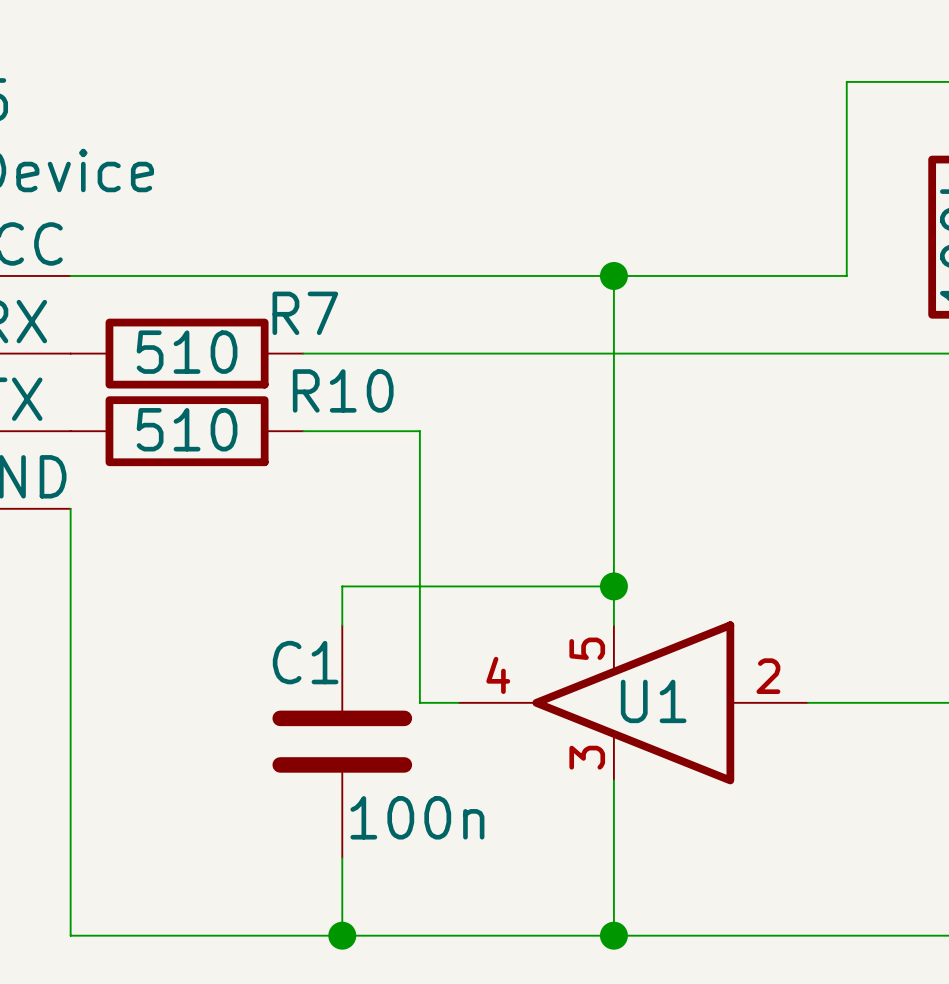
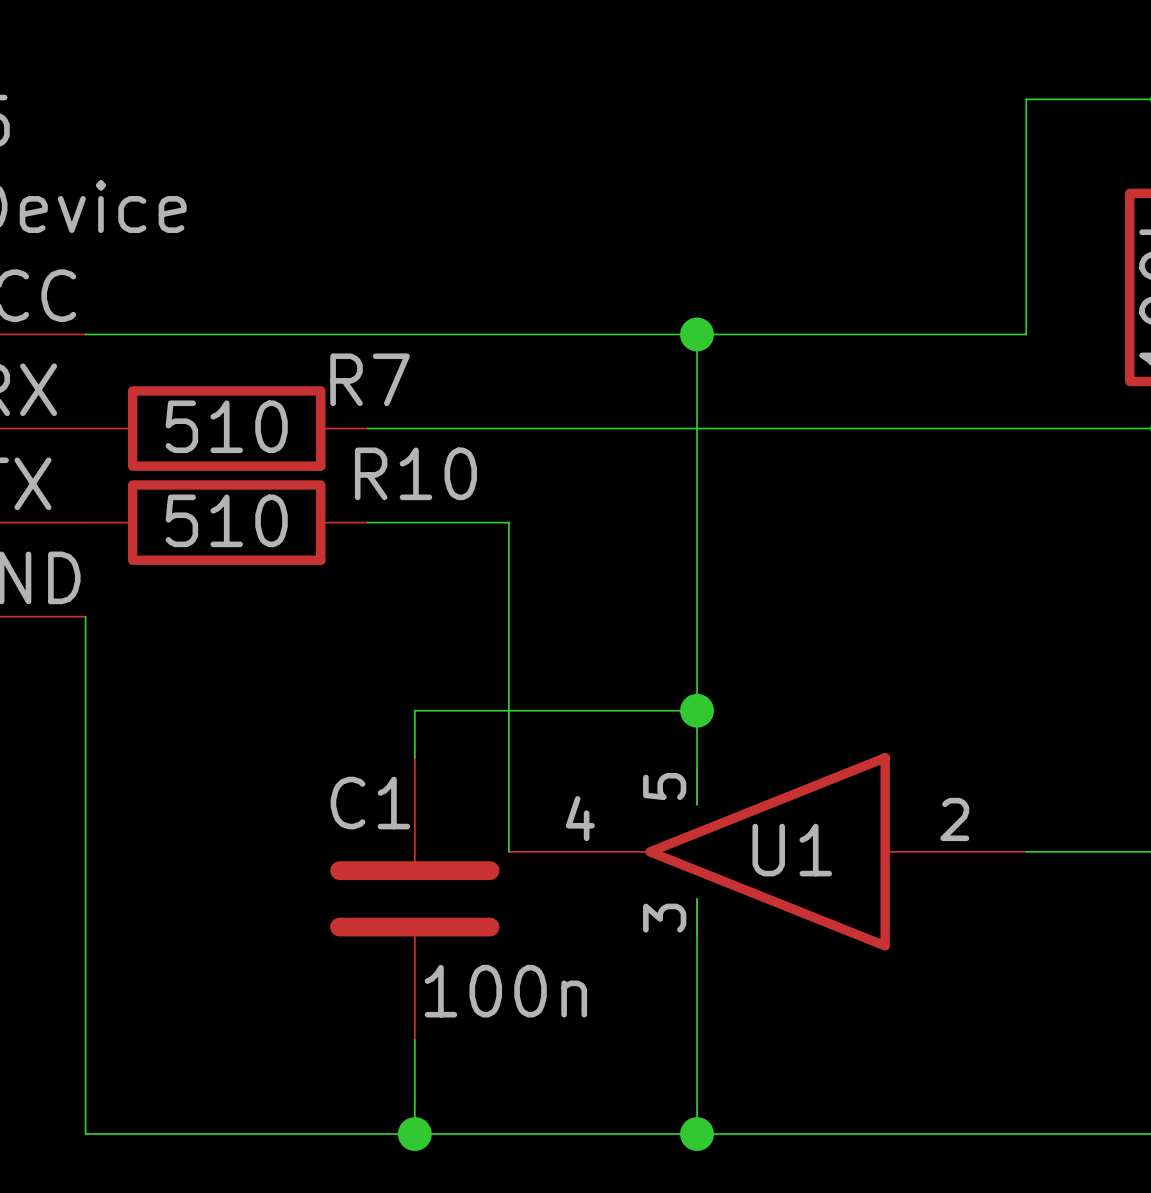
wire: none -> (697, 334) (697, 804)
wire: (613, 275) (613, 625) -> none
junction position: (613, 275) -> (697, 334)
wire: (575, 586) (613, 586) -> none
junction position: (613, 586) -> (697, 710)
U1 symbol: [458, 621, 808, 785] -> [508, 753, 1027, 951]
wire: none -> (697, 898) (697, 1134)
wire: (613, 780) (613, 935) -> none
junction position: (613, 935) -> (697, 1134)

